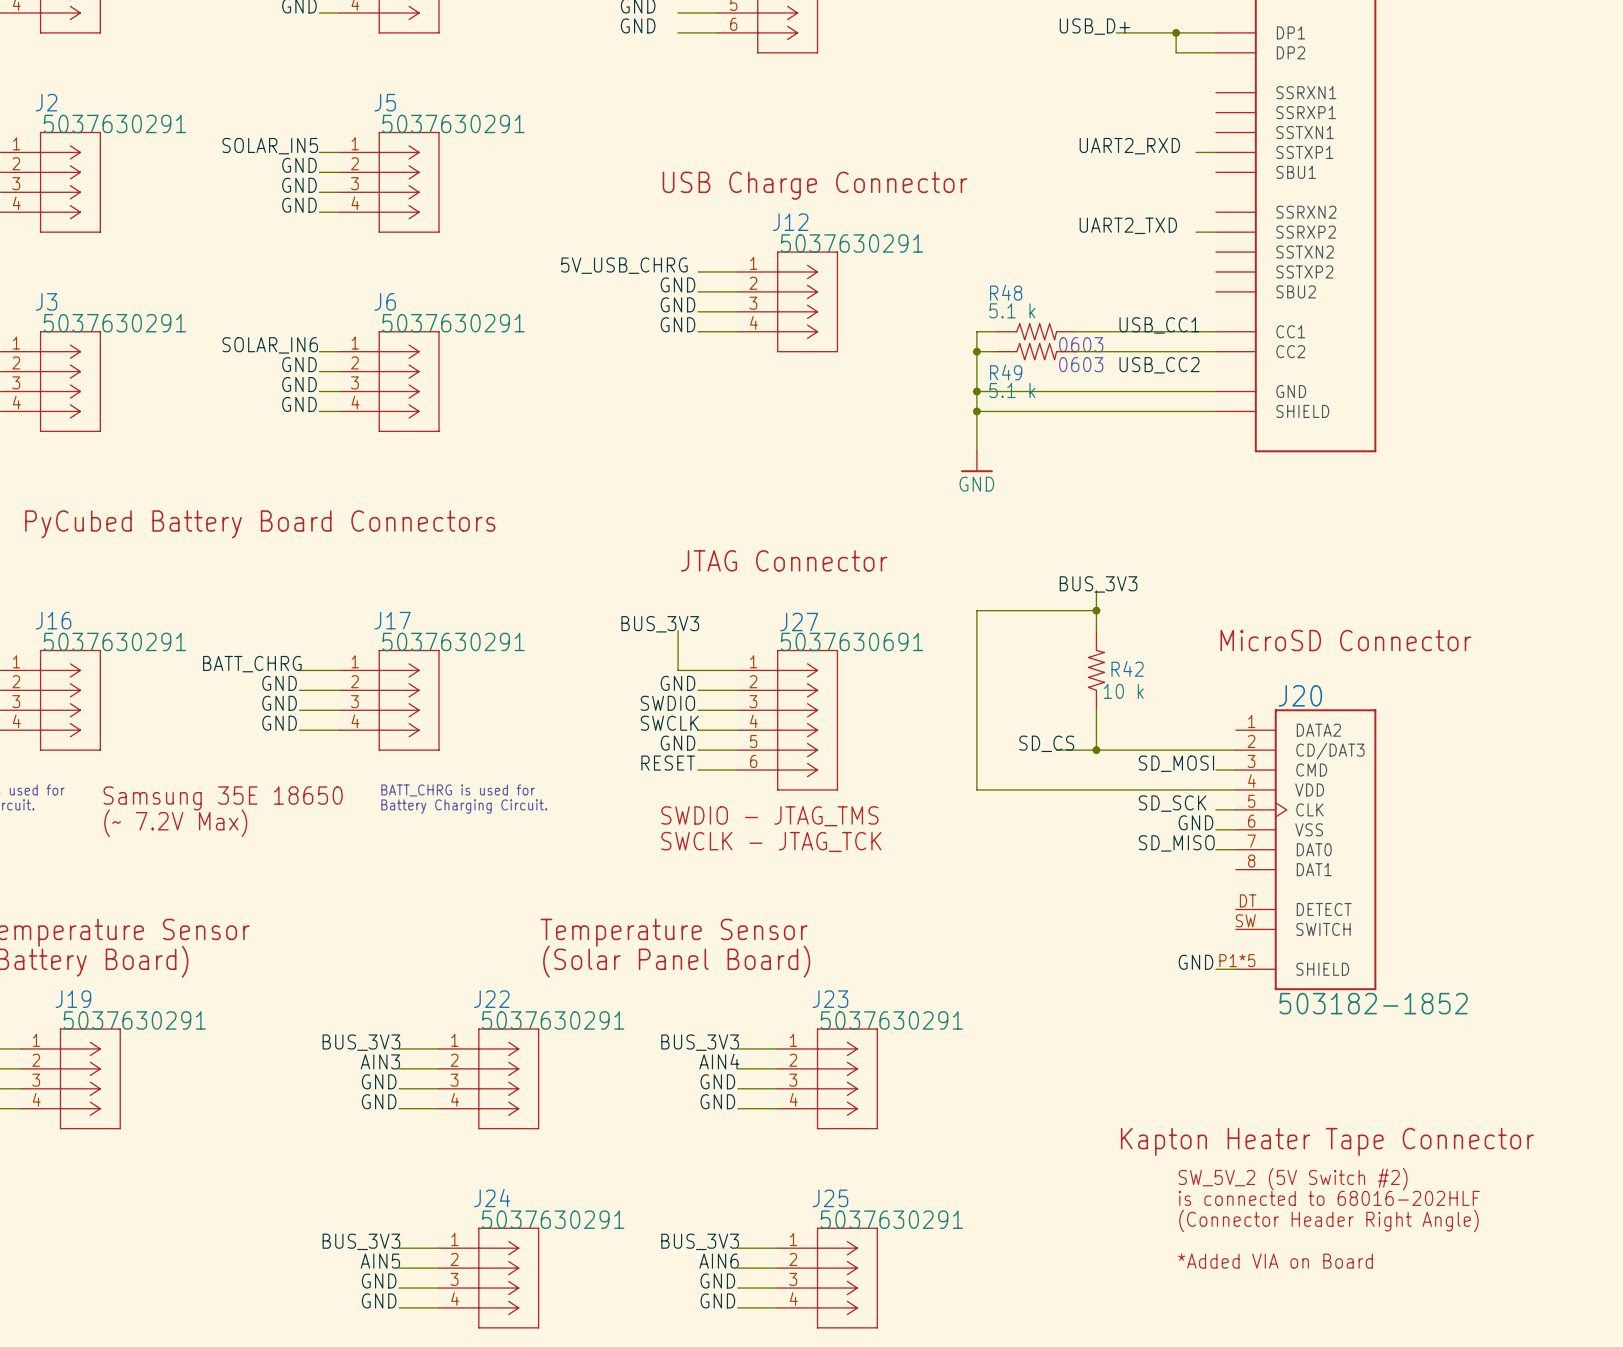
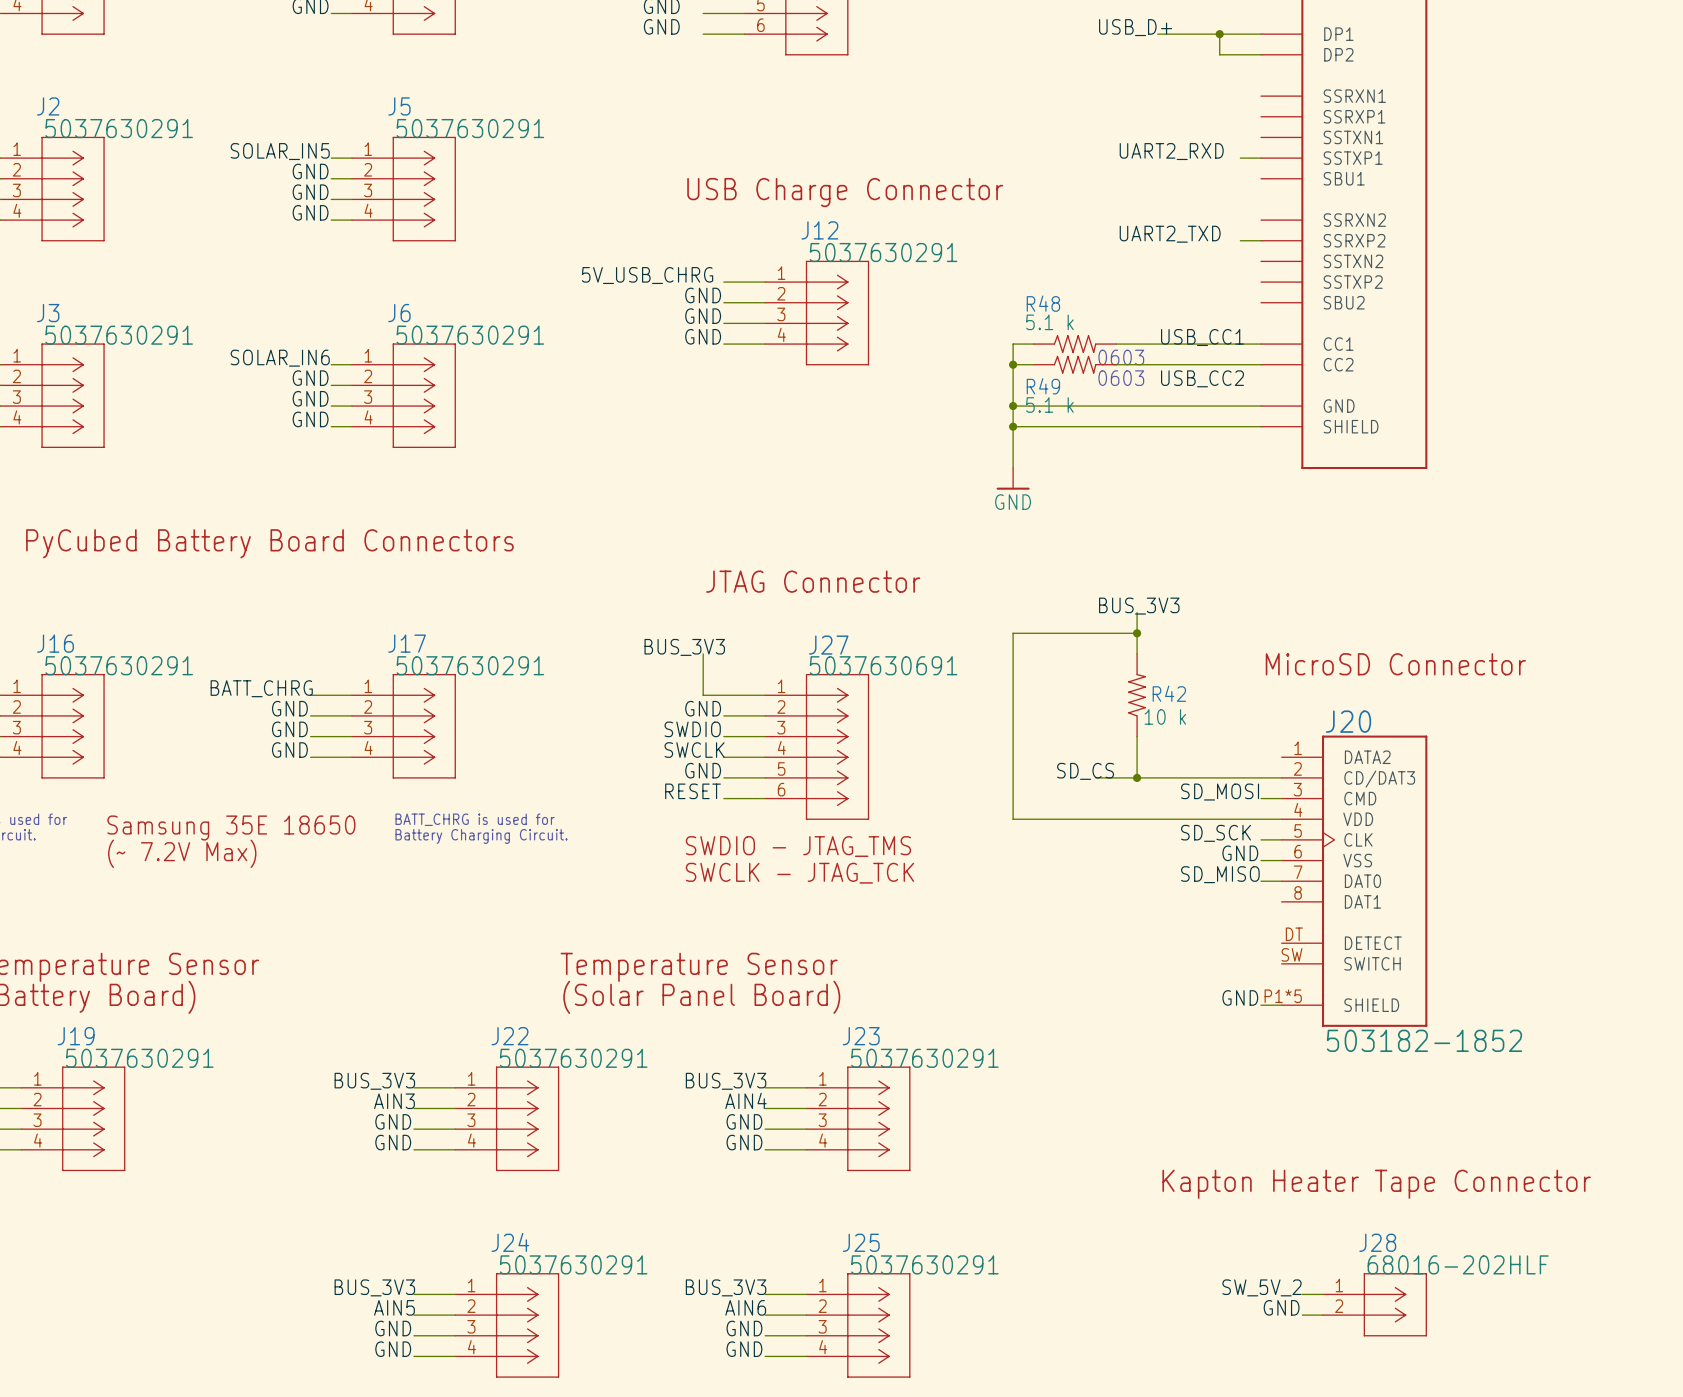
text: SW_5V_2 (5V Switch #2) (1293, 1179) -> none
text: is connected to 68016-202HLF (1329, 1198) -> none
text: (Connector Header Right Angle) (1328, 1220) -> none
label: none -> SW_5V_2 (1262, 1287)
wire: none -> (1302, 1294) (1323, 1294)
J28: none -> 68016-202HLF (1374, 1304)
label: none -> GND (1281, 1307)
text: *Added VIA on Board (1275, 1261) -> none
wire: none -> (1302, 1315) (1323, 1315)

